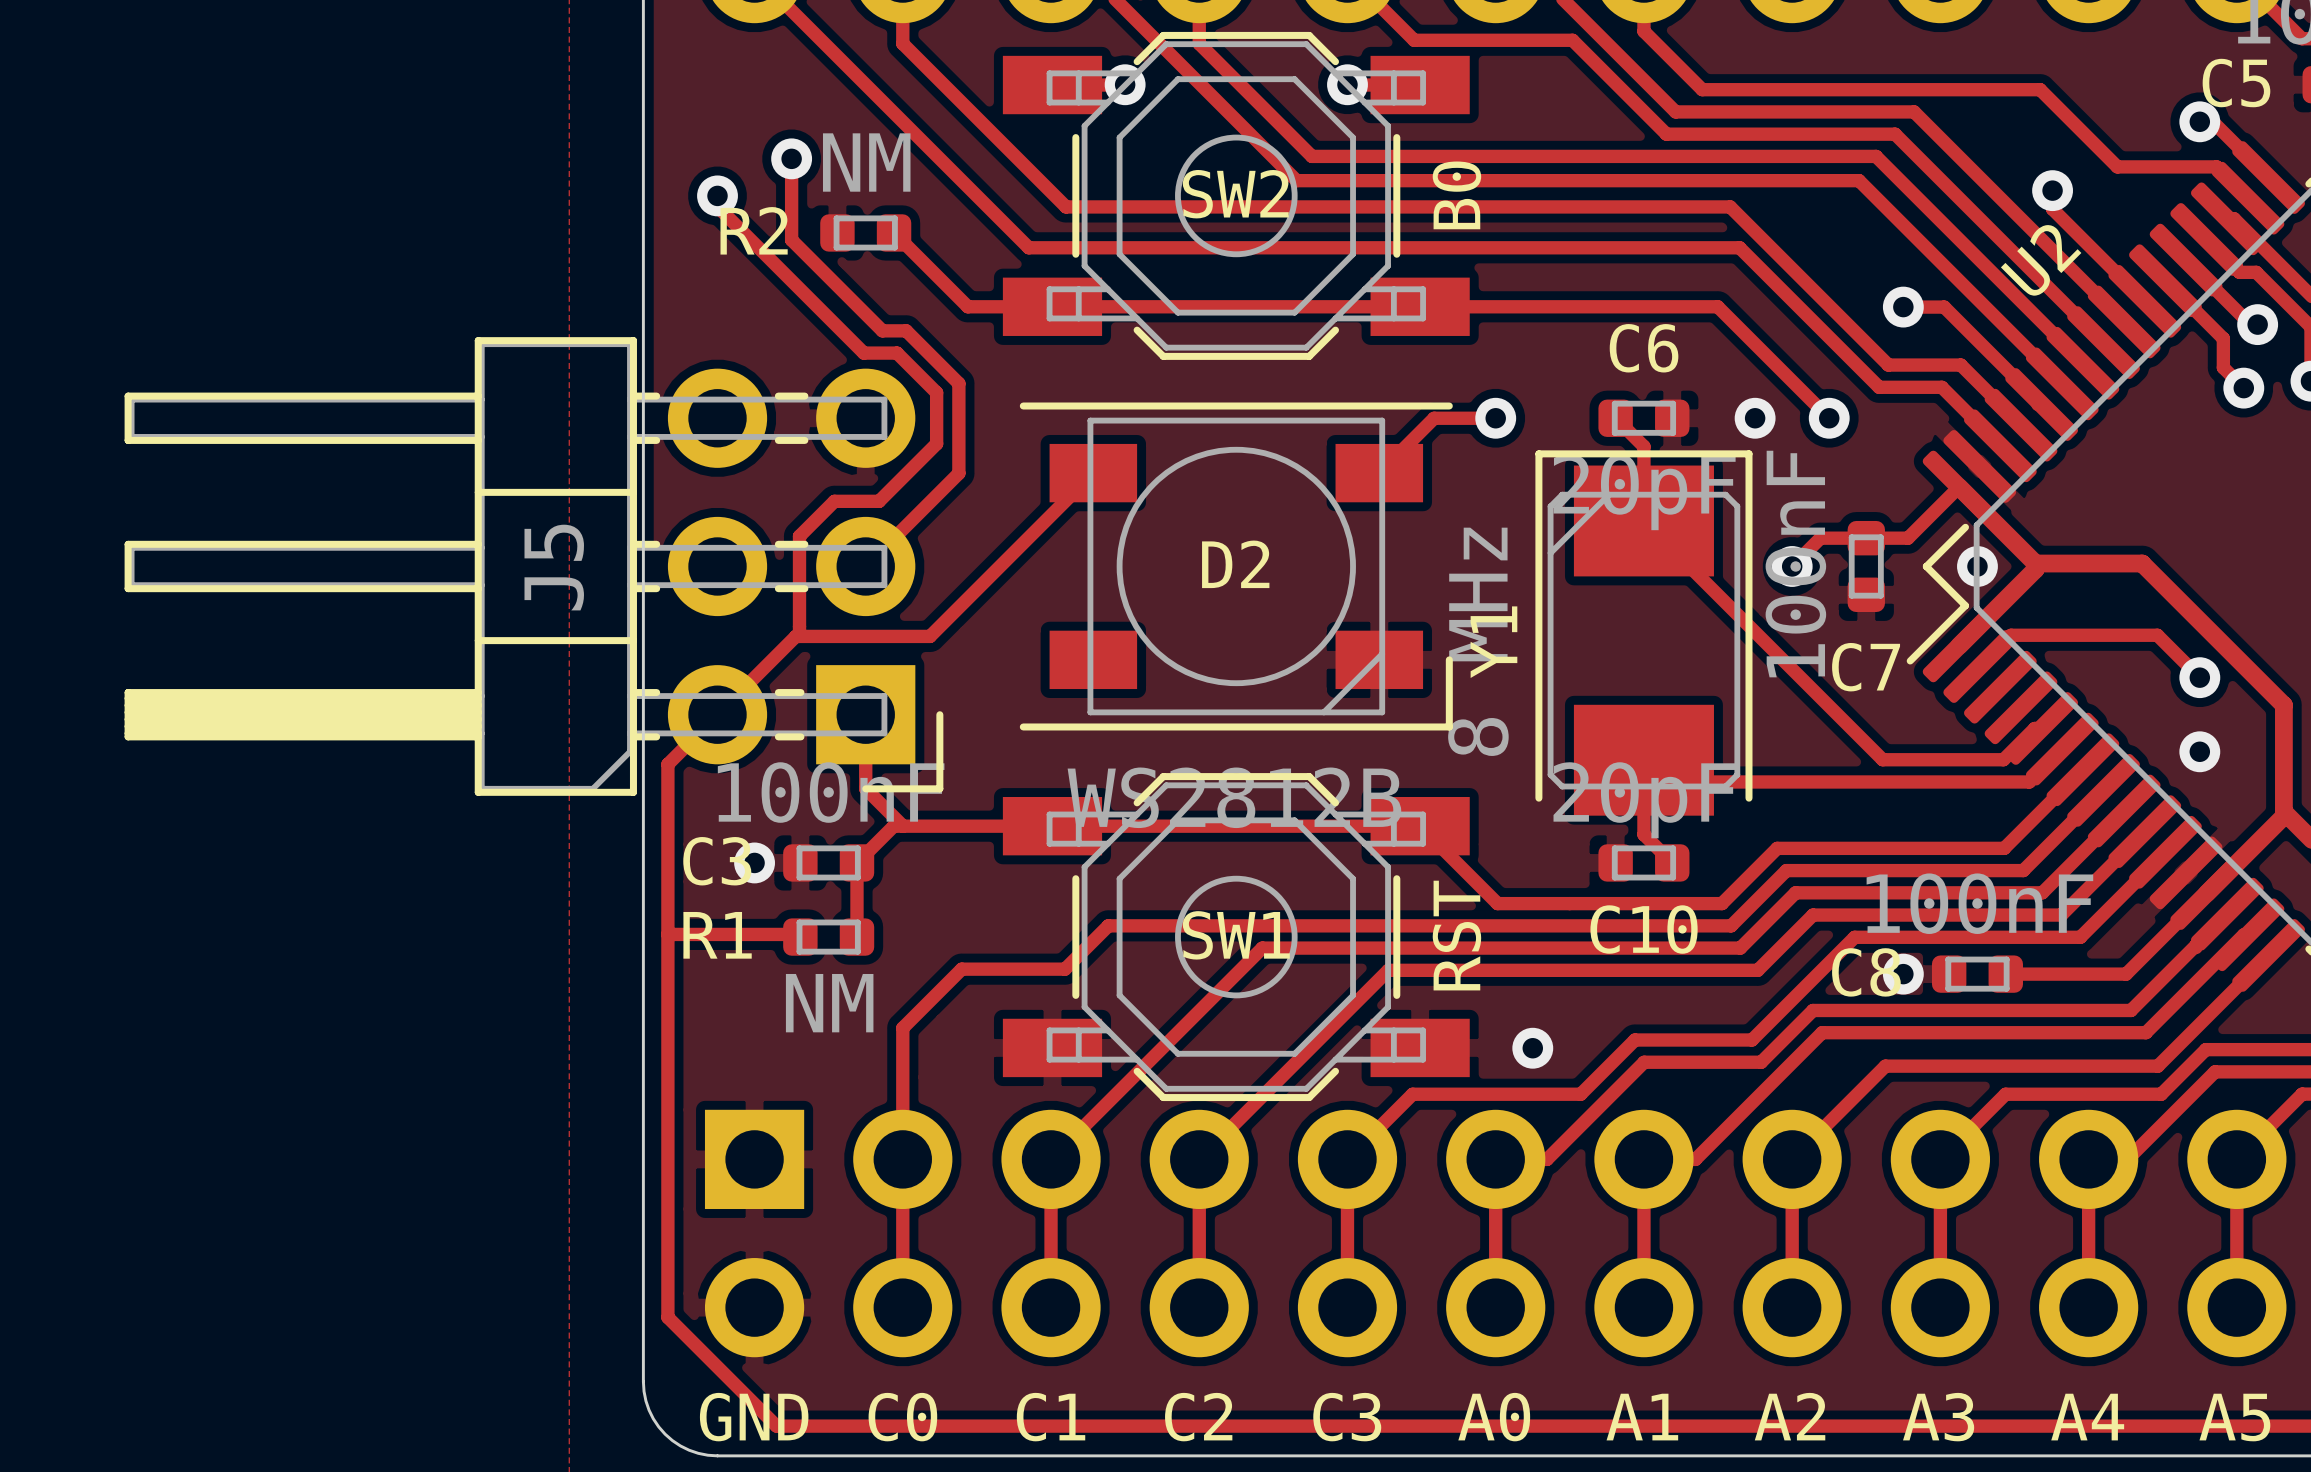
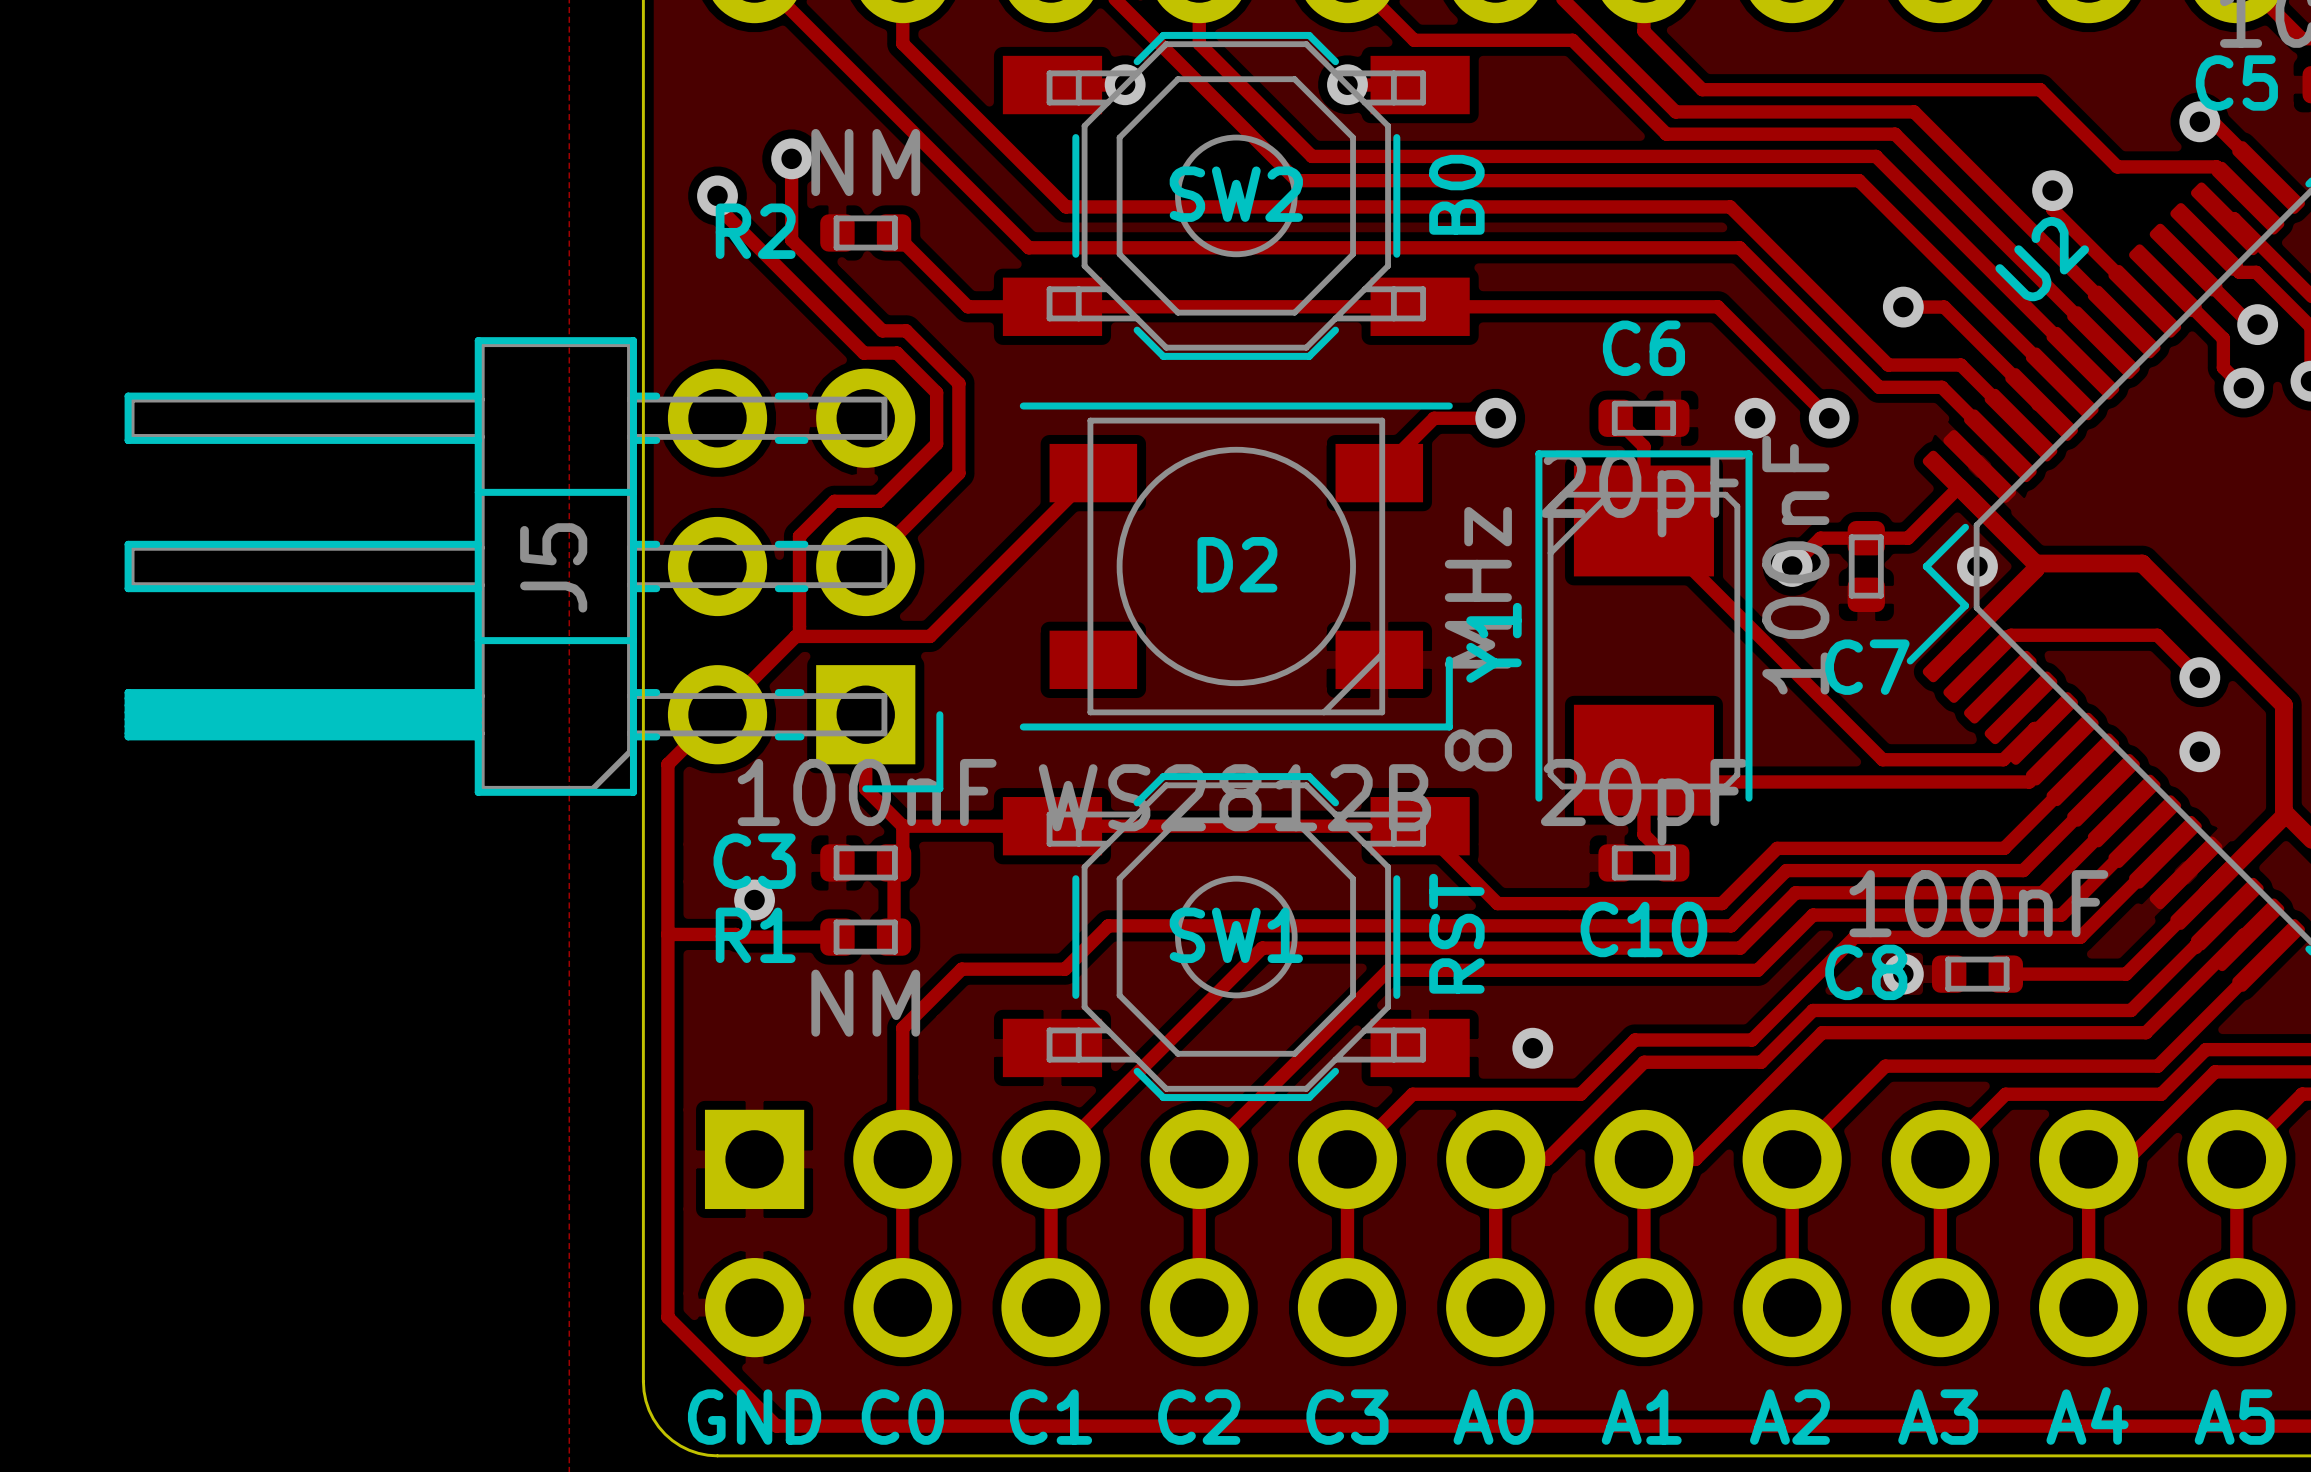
track: (902, 826) (893, 826) (856, 862) (856, 937) -> (902, 826) (902, 854) (894, 862) (894, 937)
via position: (754, 862) -> (754, 900)
C3 position: (828, 862) -> (865, 862)
track: (735, 934) (797, 934) (800, 937) -> (735, 934) (738, 937) (837, 937)
R1 position: (828, 937) -> (865, 937)

